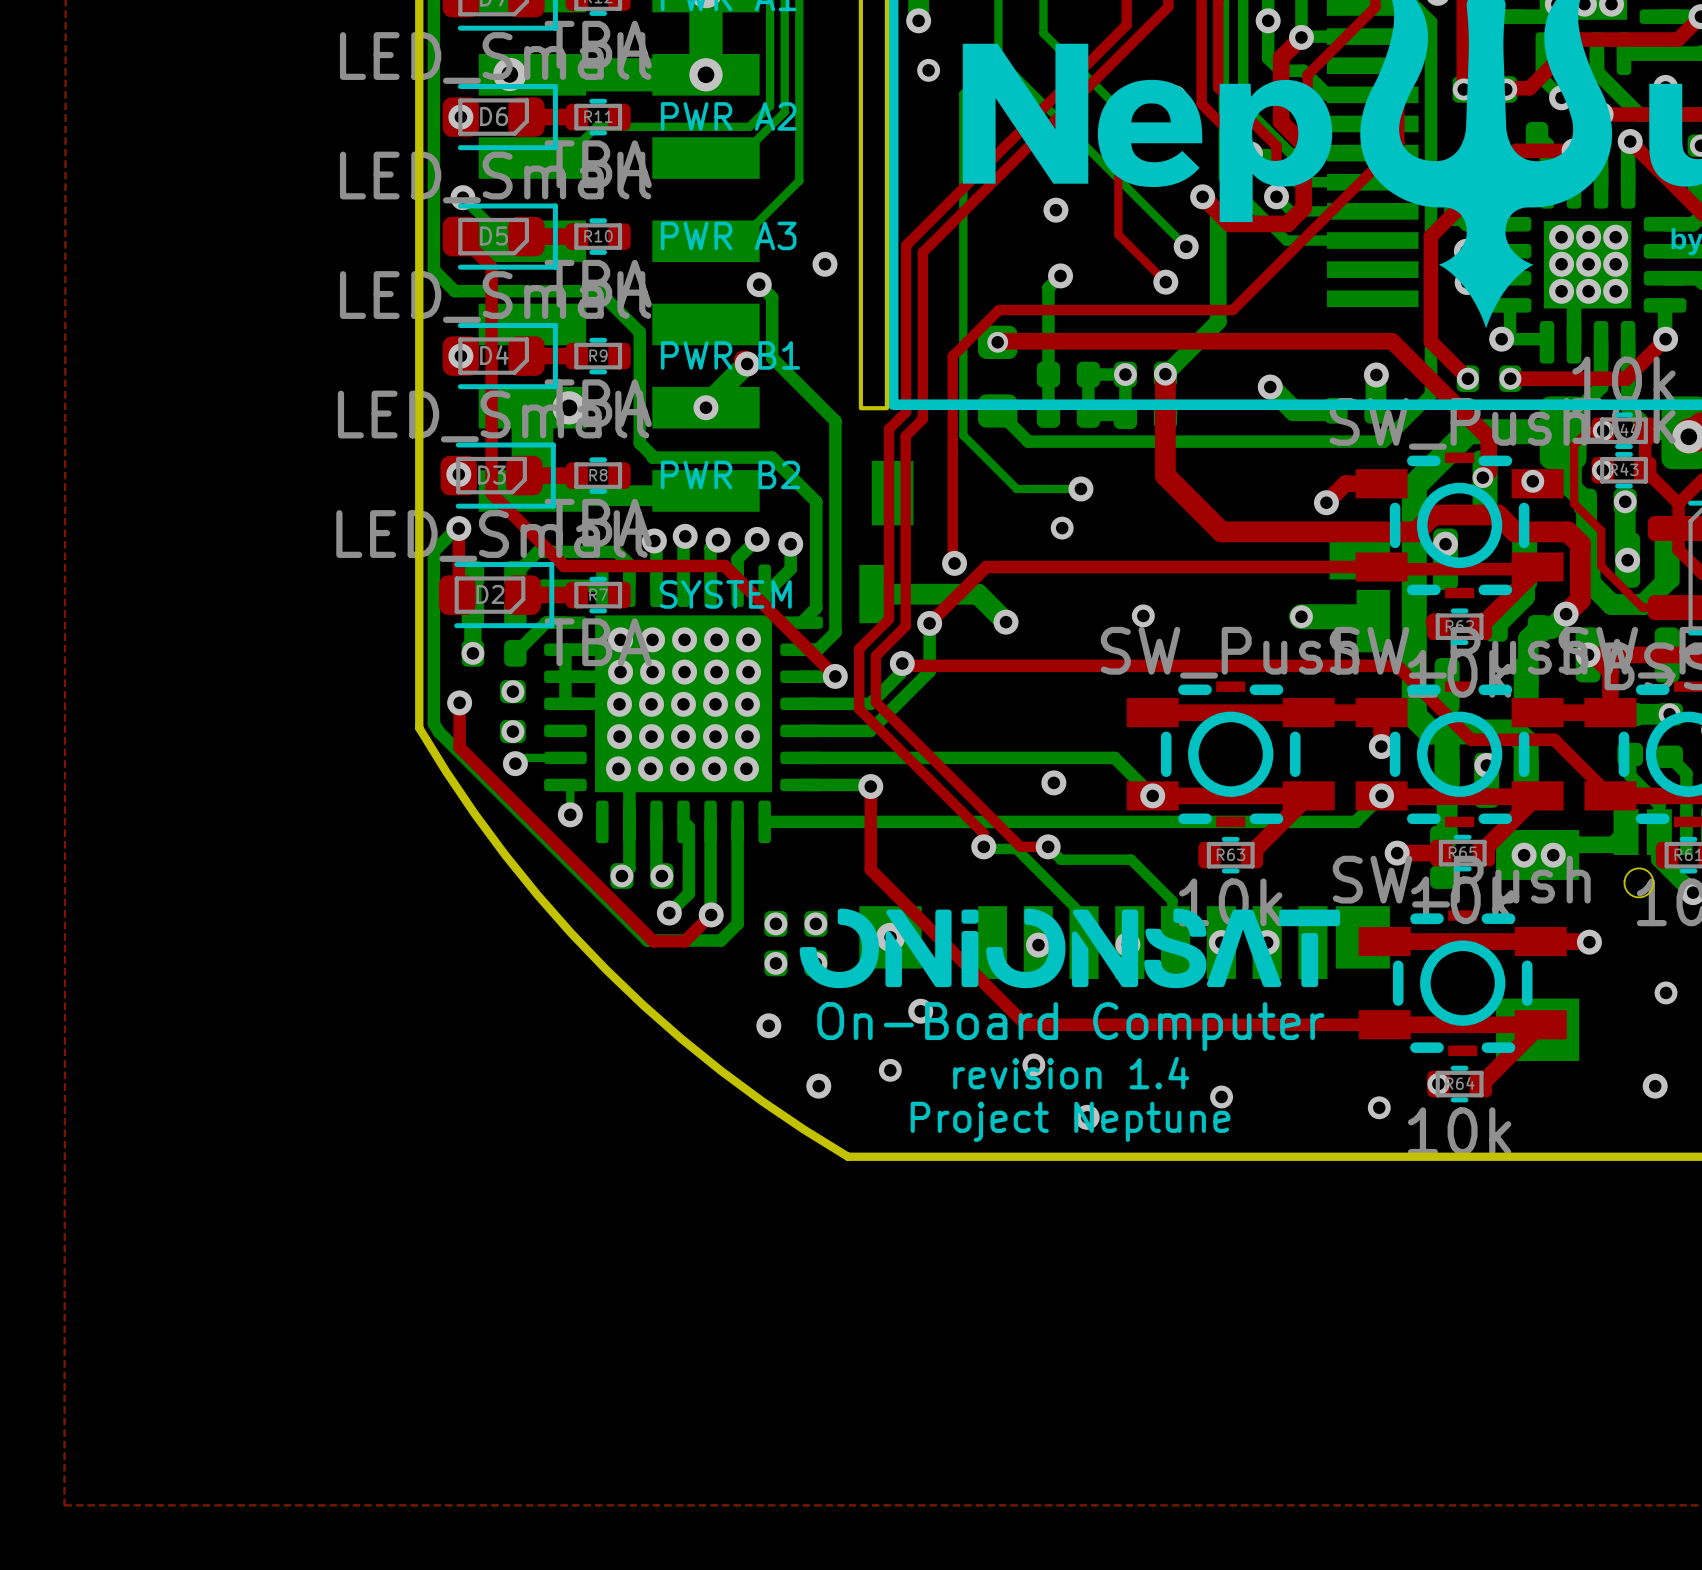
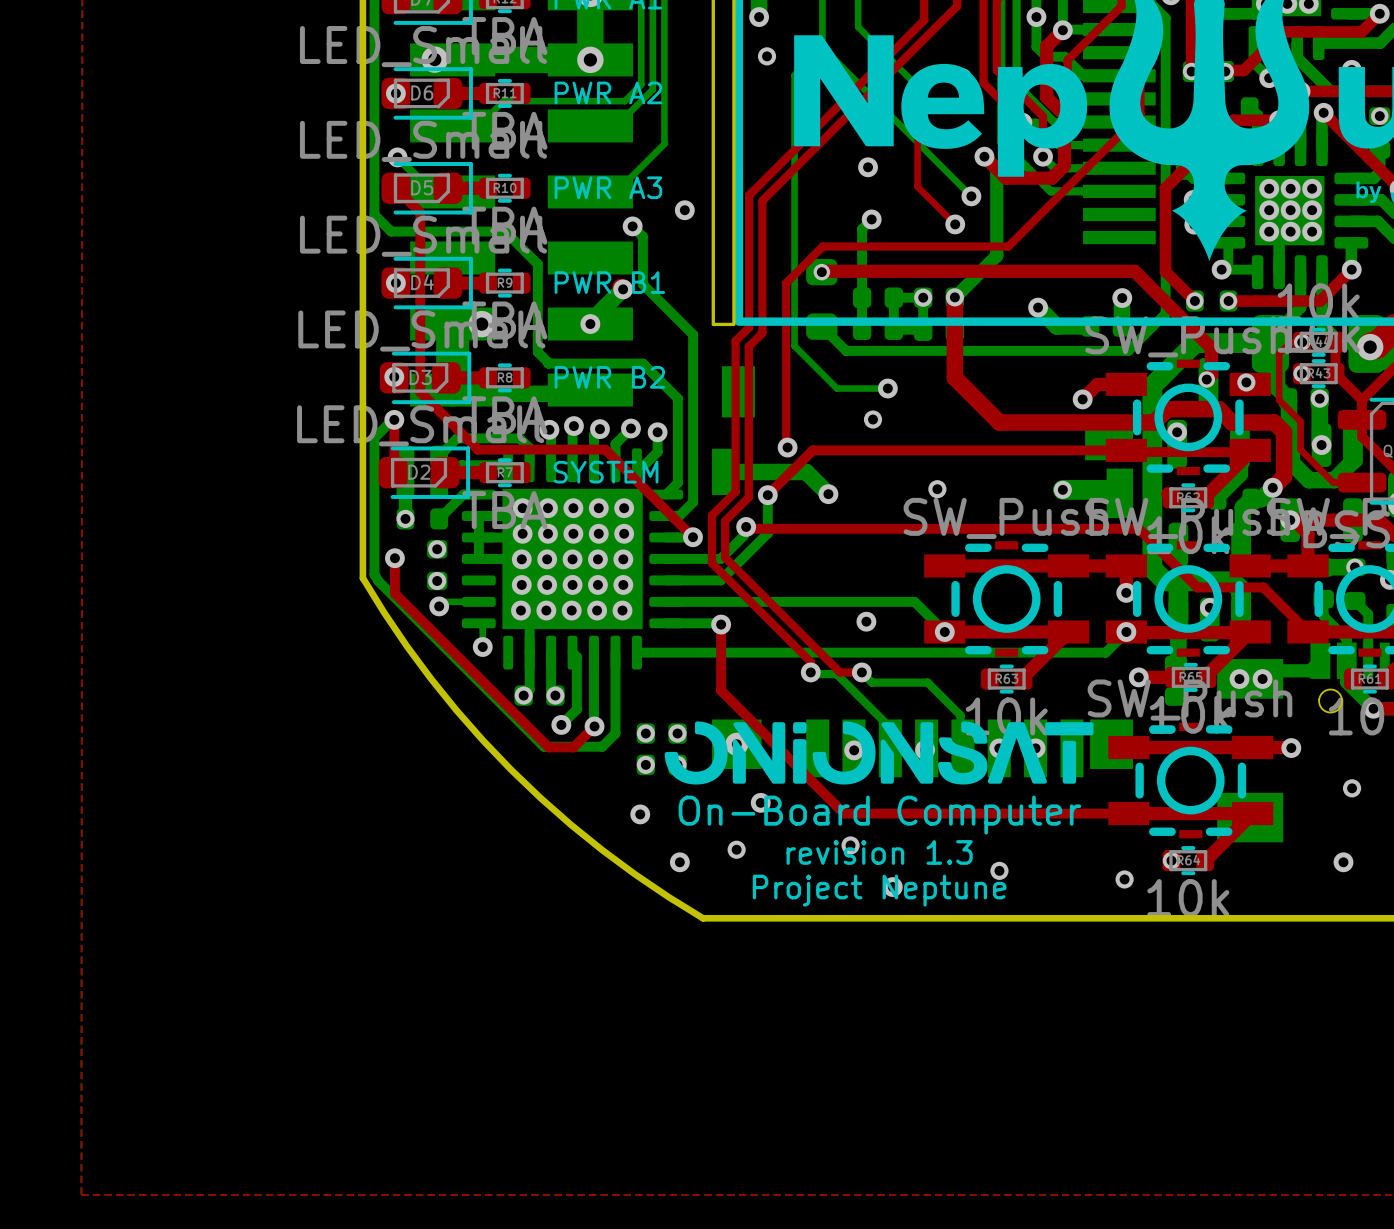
text: revision 1.4 (1071, 1073) -> revision 1.3 (879, 852)

